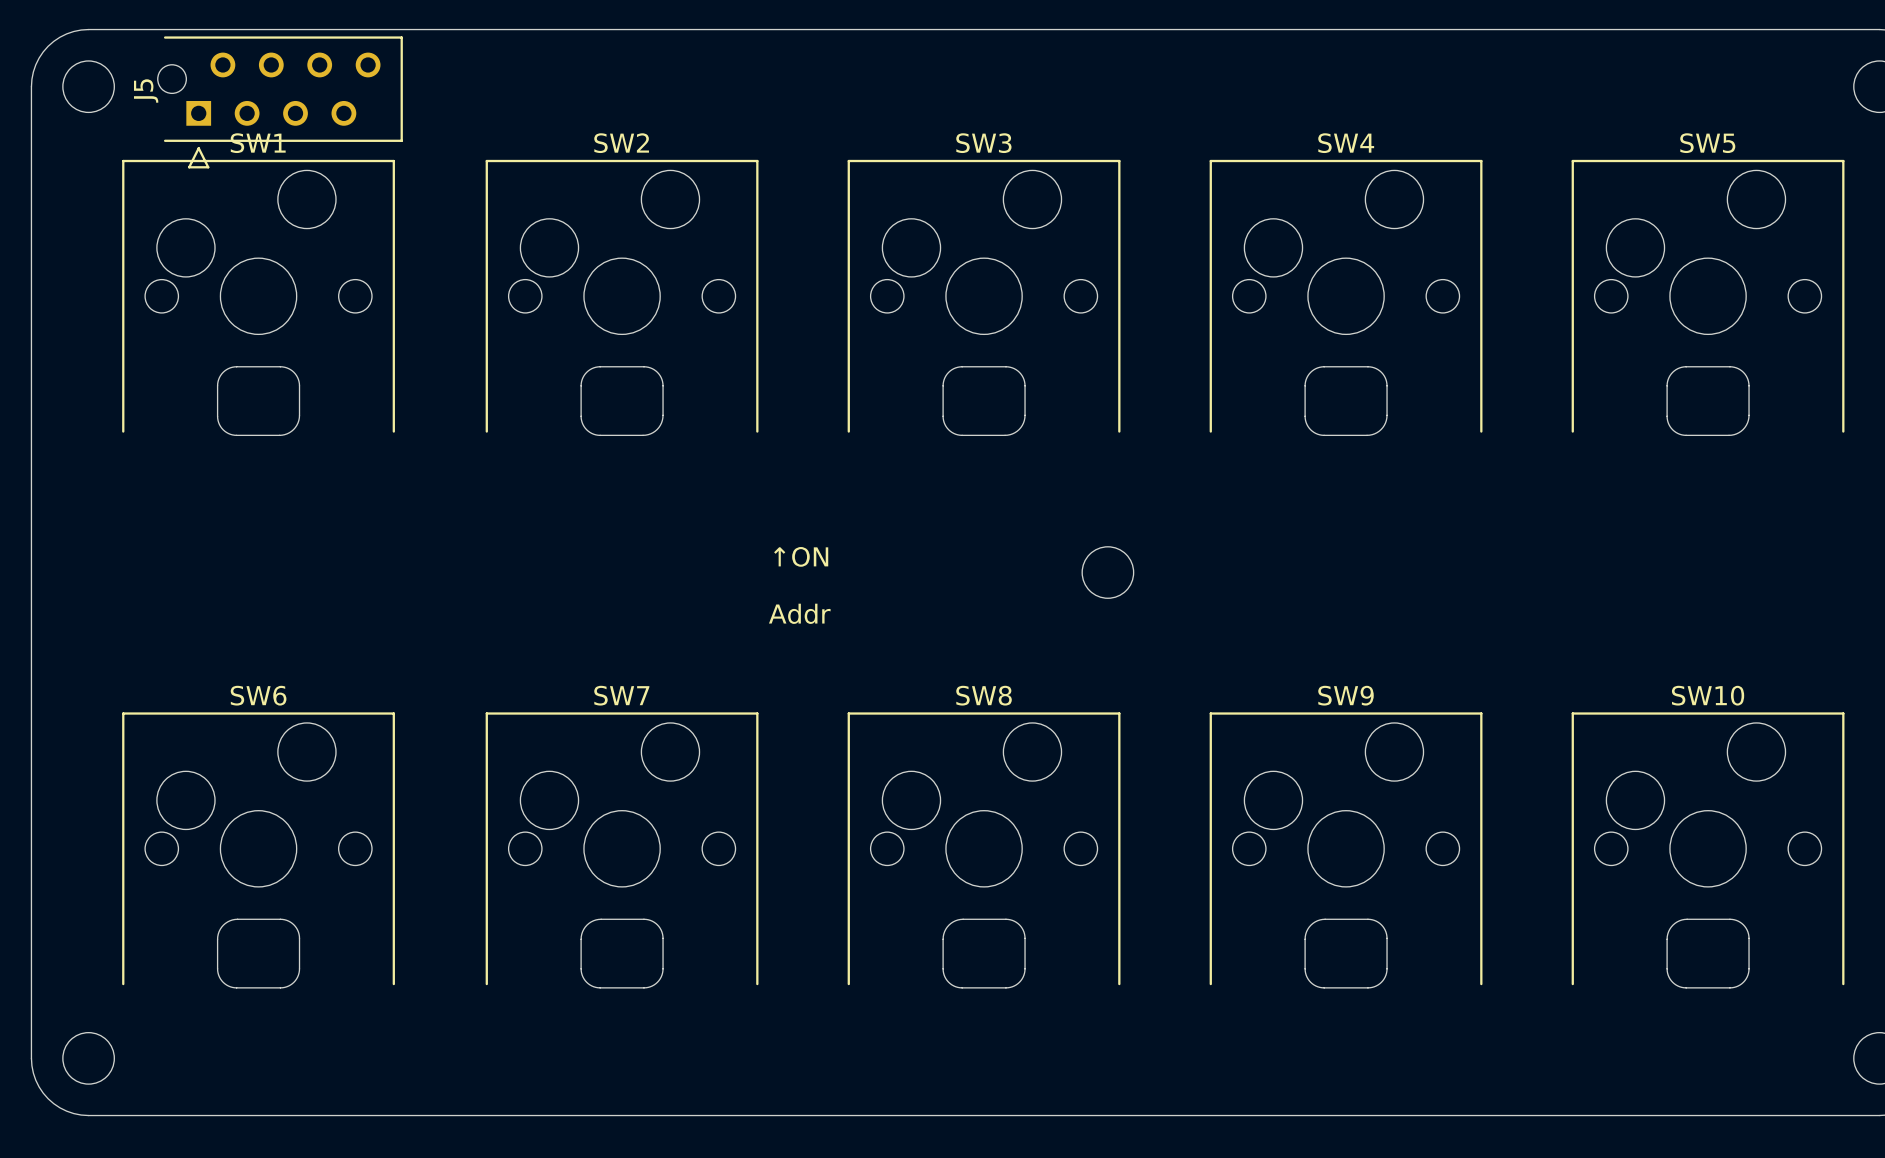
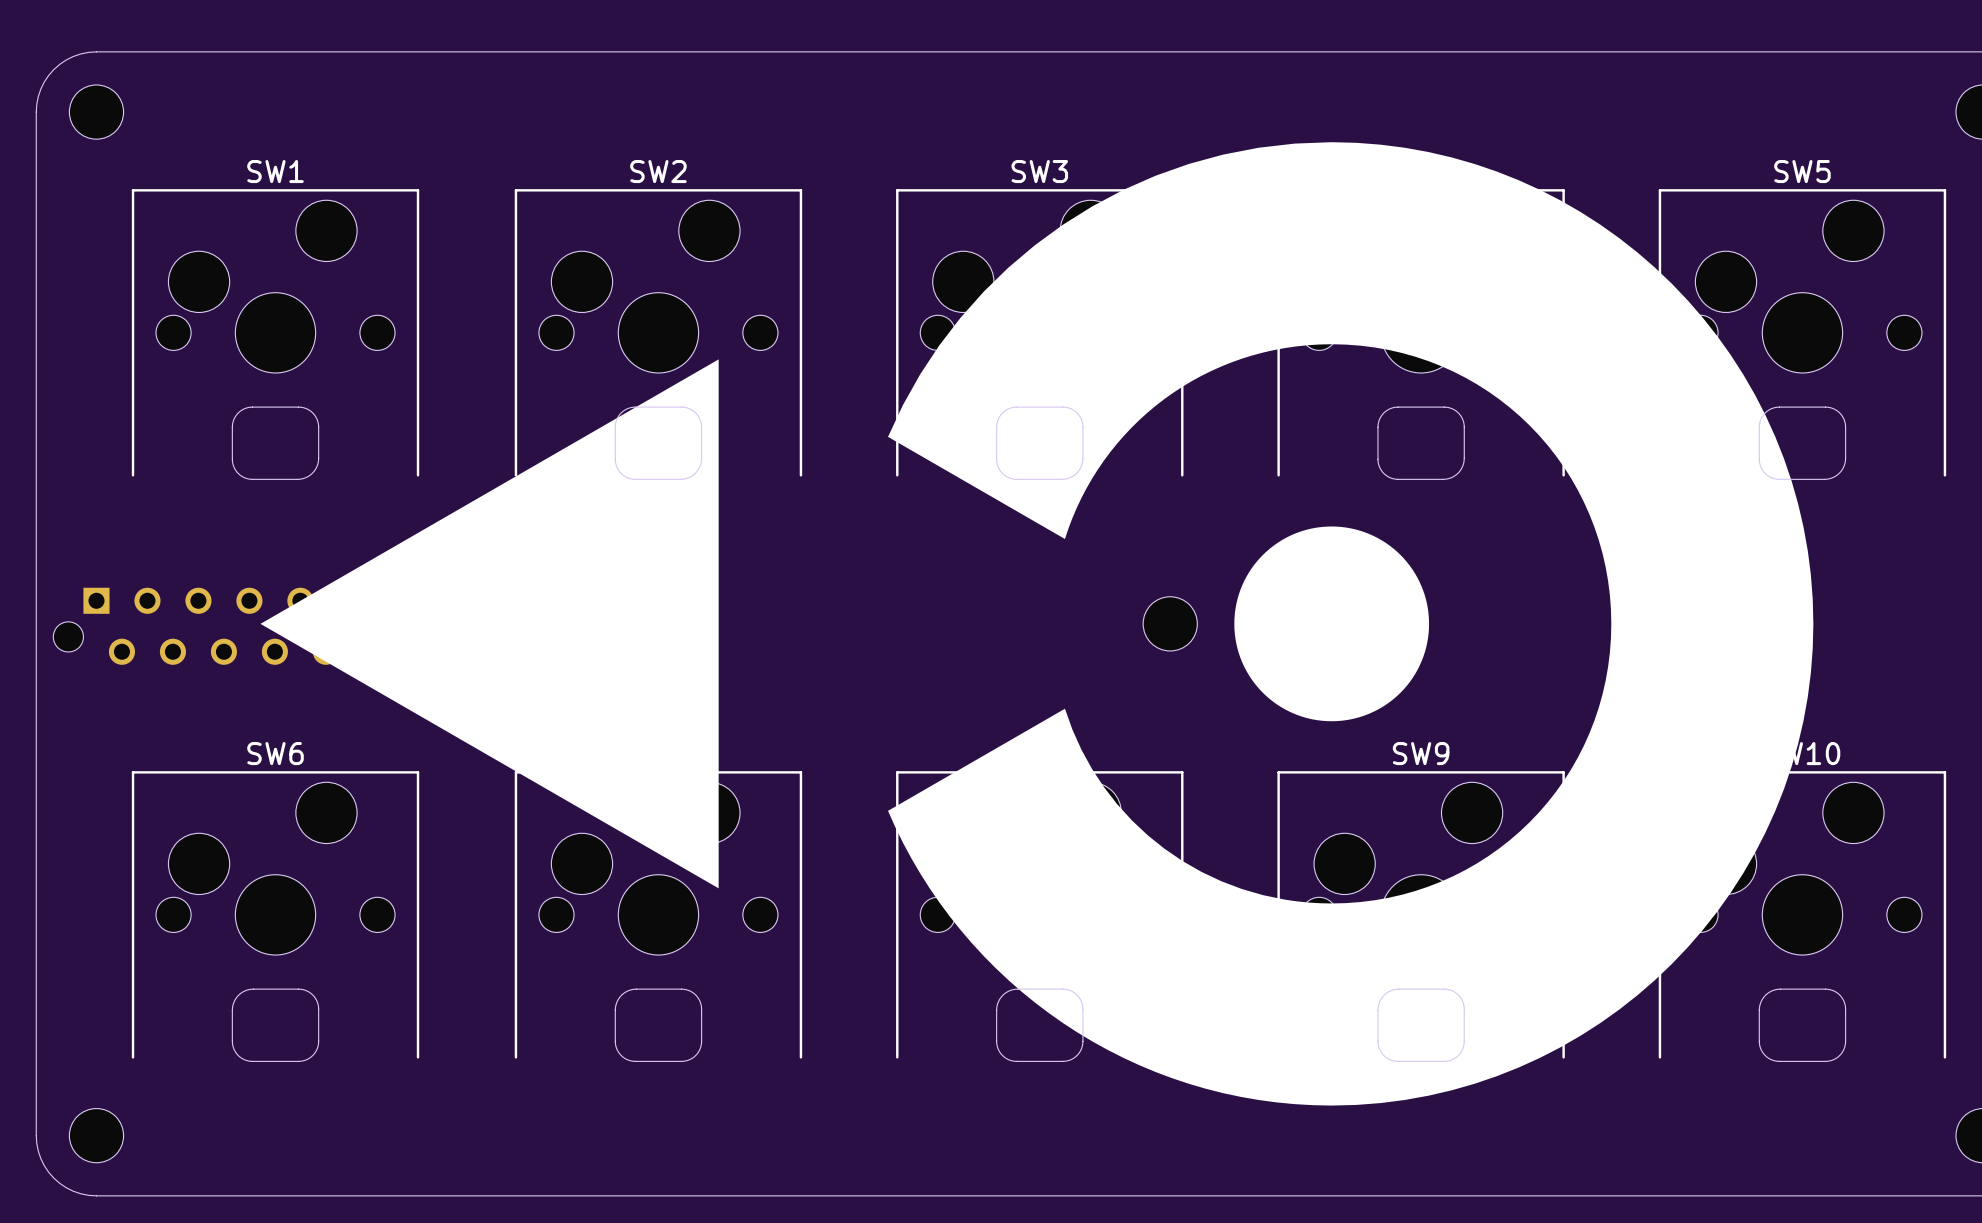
J5: (280, 102) -> none
drawing: none -> [888, 142, 1814, 1106]
drawing: none -> [260, 359, 719, 889]
text: ↑ON (801, 556) -> none
part: none -> (221, 626)
text: Addr (799, 613) -> none

